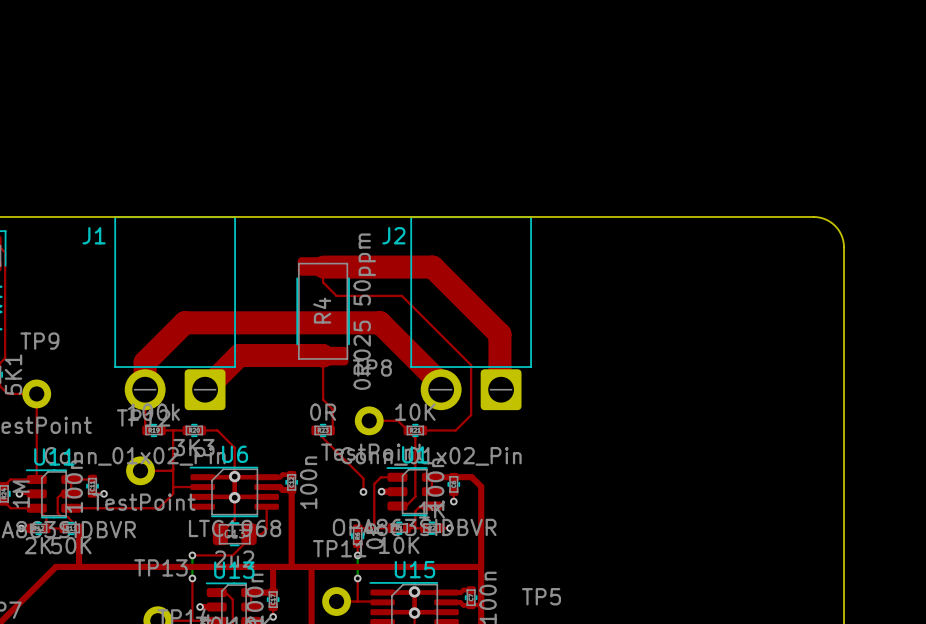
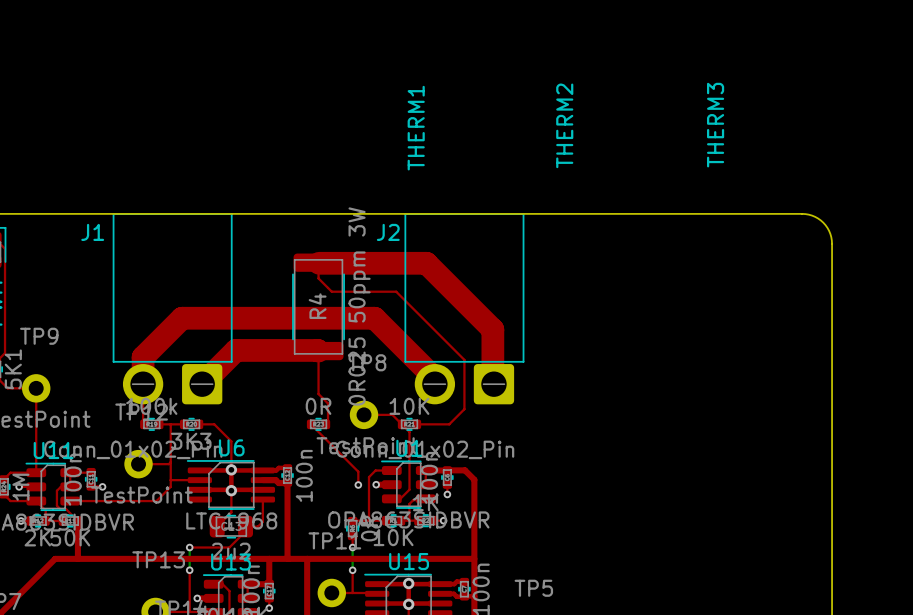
text: none -> THERM3 (715, 125)
text: none -> THERM2 (564, 125)
text: none -> THERM1 (416, 128)
R4 value: 0R025 50ppm (364, 311) -> 0R025 50ppm 3W (359, 306)

